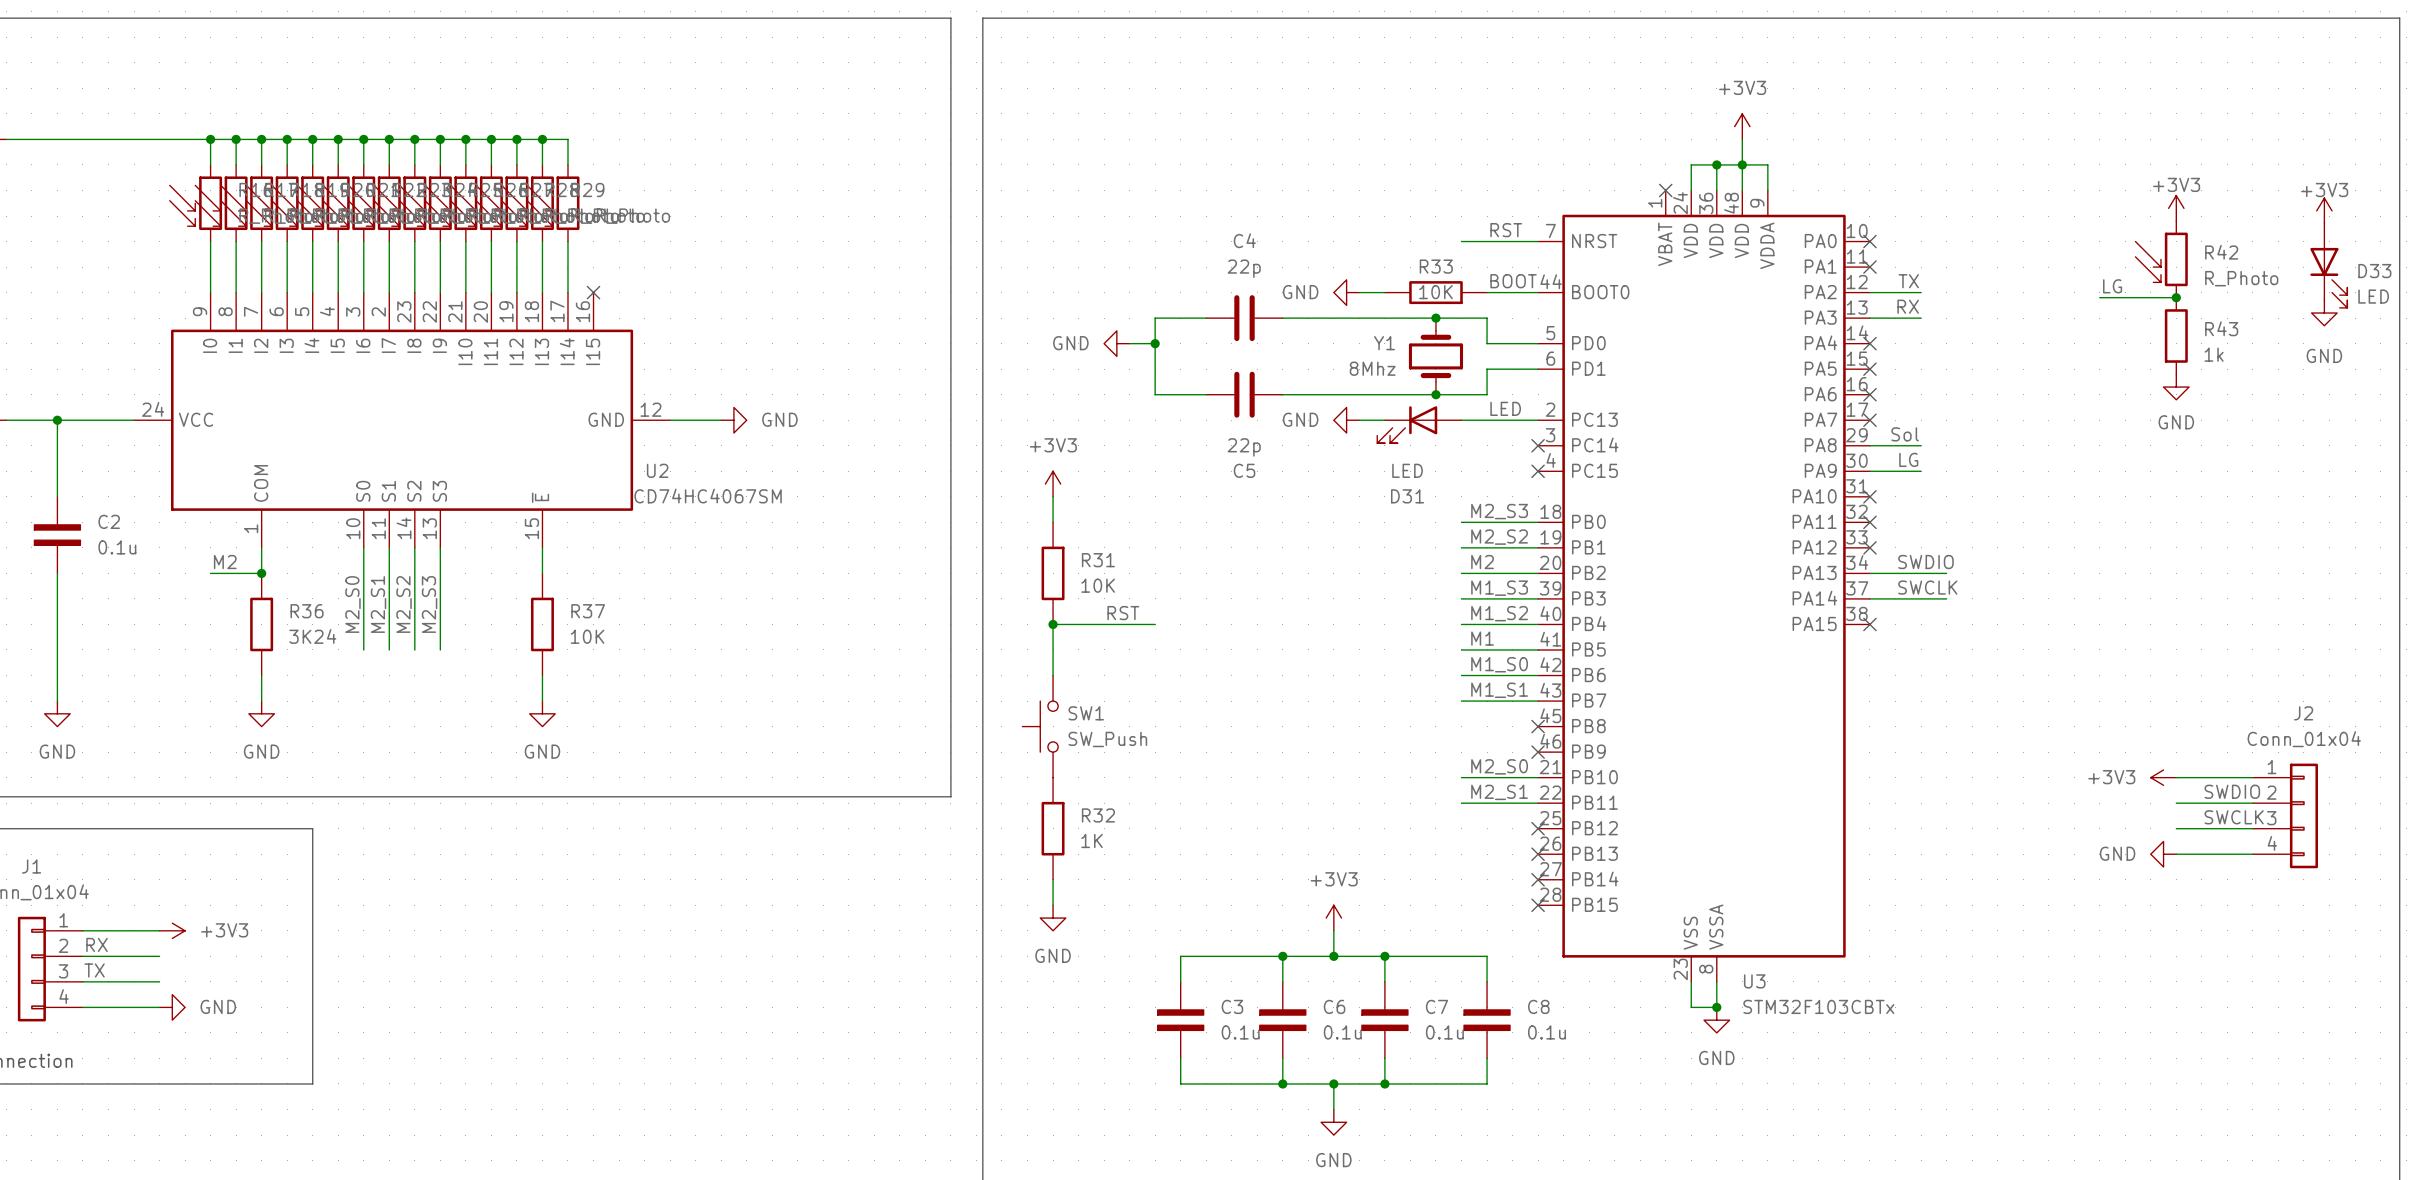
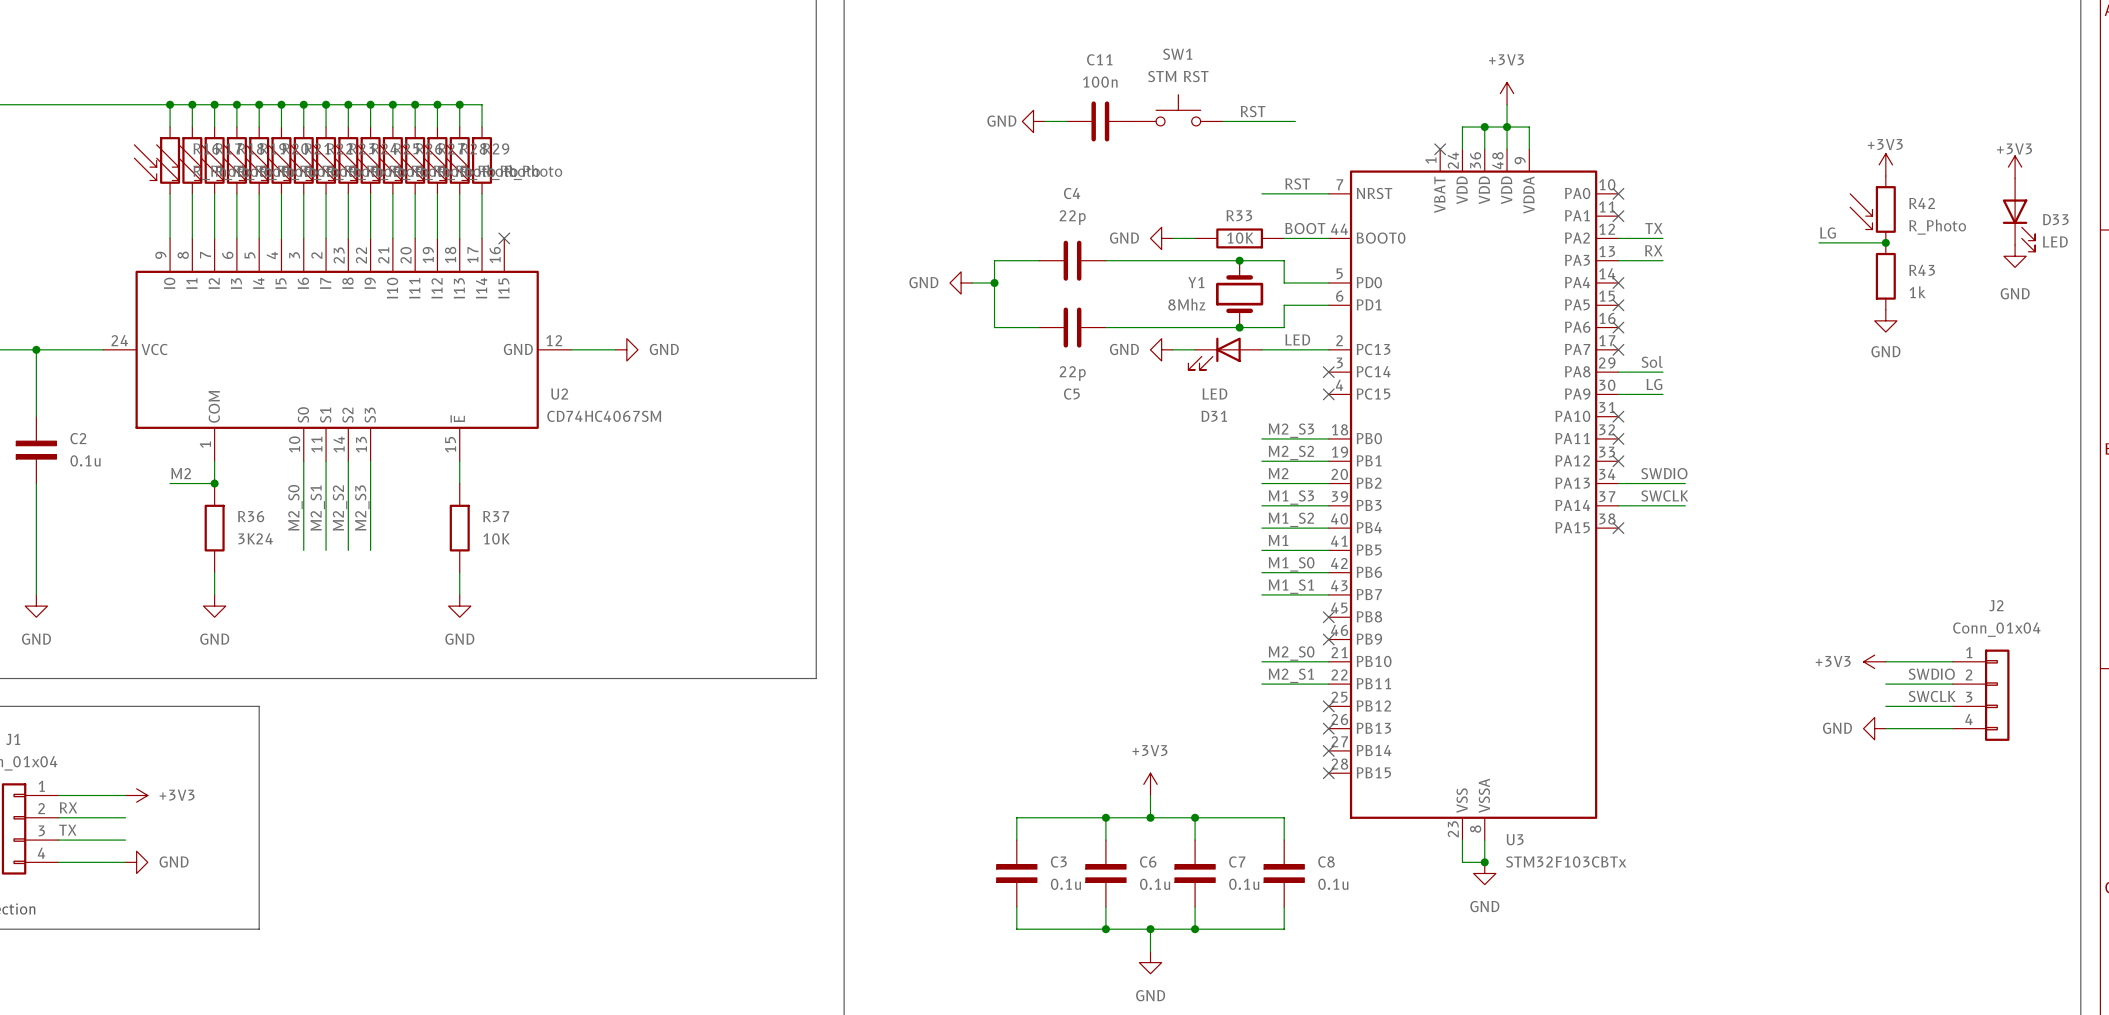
label: none -> RST (1253, 111)
power symbol: none -> GND (1033, 121)
wire: none -> (1044, 121) (1066, 121)
C11: none -> 100n (1100, 121)
wire: none -> (1222, 121) (1295, 121)
power symbol: +3V3 (1053, 484) -> none
wire: (1053, 496) (1053, 522) -> none
R31: 10K (1053, 573) -> none
label: RST (1123, 613) -> none
junction: (1053, 624) -> none
wire: (1155, 624) (1053, 624) (1053, 675) -> none
SW1 name position: SW1 (1086, 713) -> SW1 (1177, 54)
SW1 rotation: 0° (1040, 726) -> 90° clockwise (1178, 110)
SW1 position: (1040, 726) -> (1178, 110)
SW1 value: SW_Push (1107, 739) -> STM RST (1178, 76)
R32: 1K (1053, 828) -> none
wire: (1053, 879) (1053, 905) -> none
power symbol: GND (1053, 918) -> none

